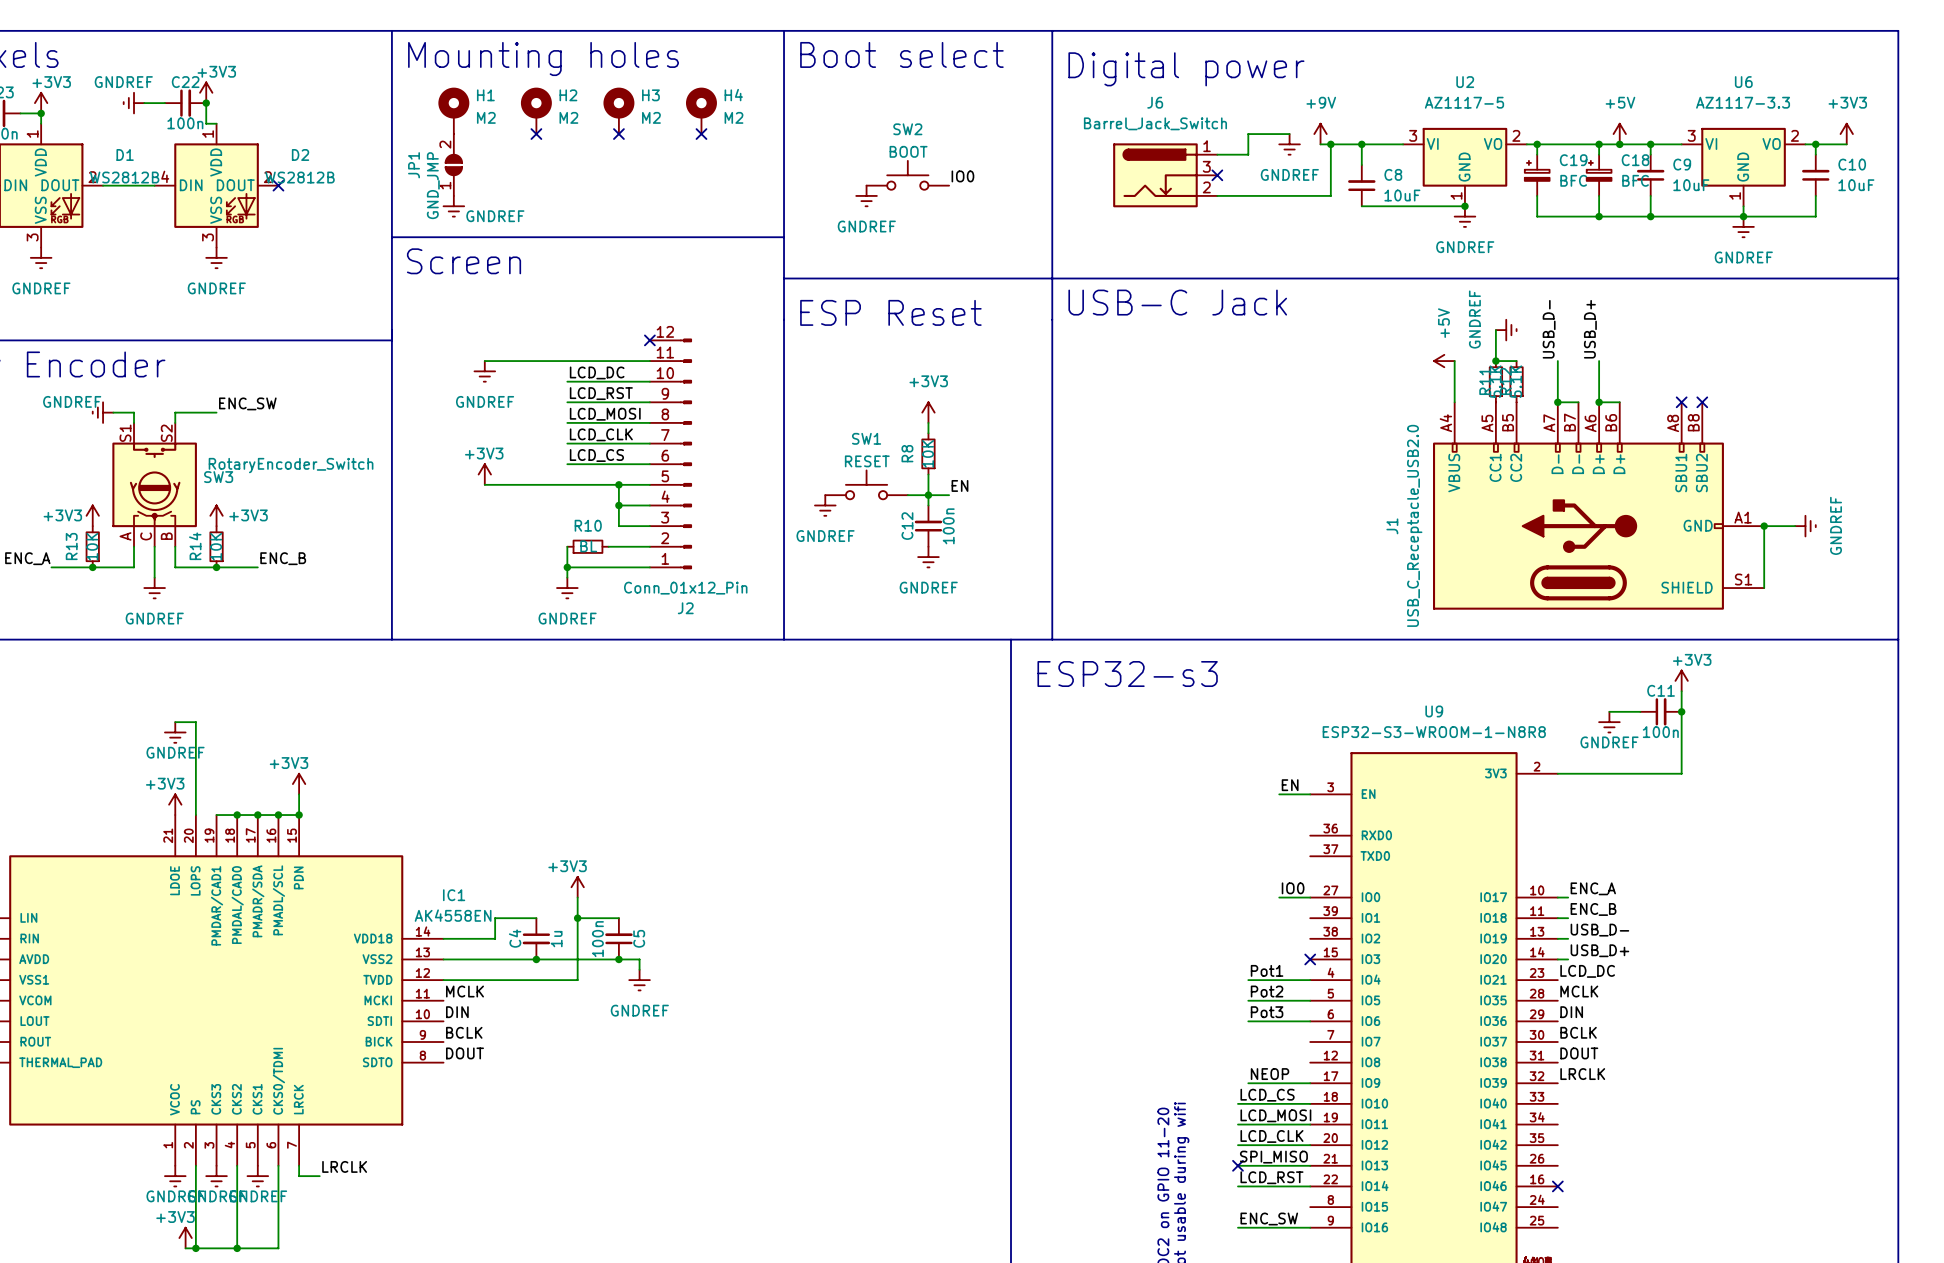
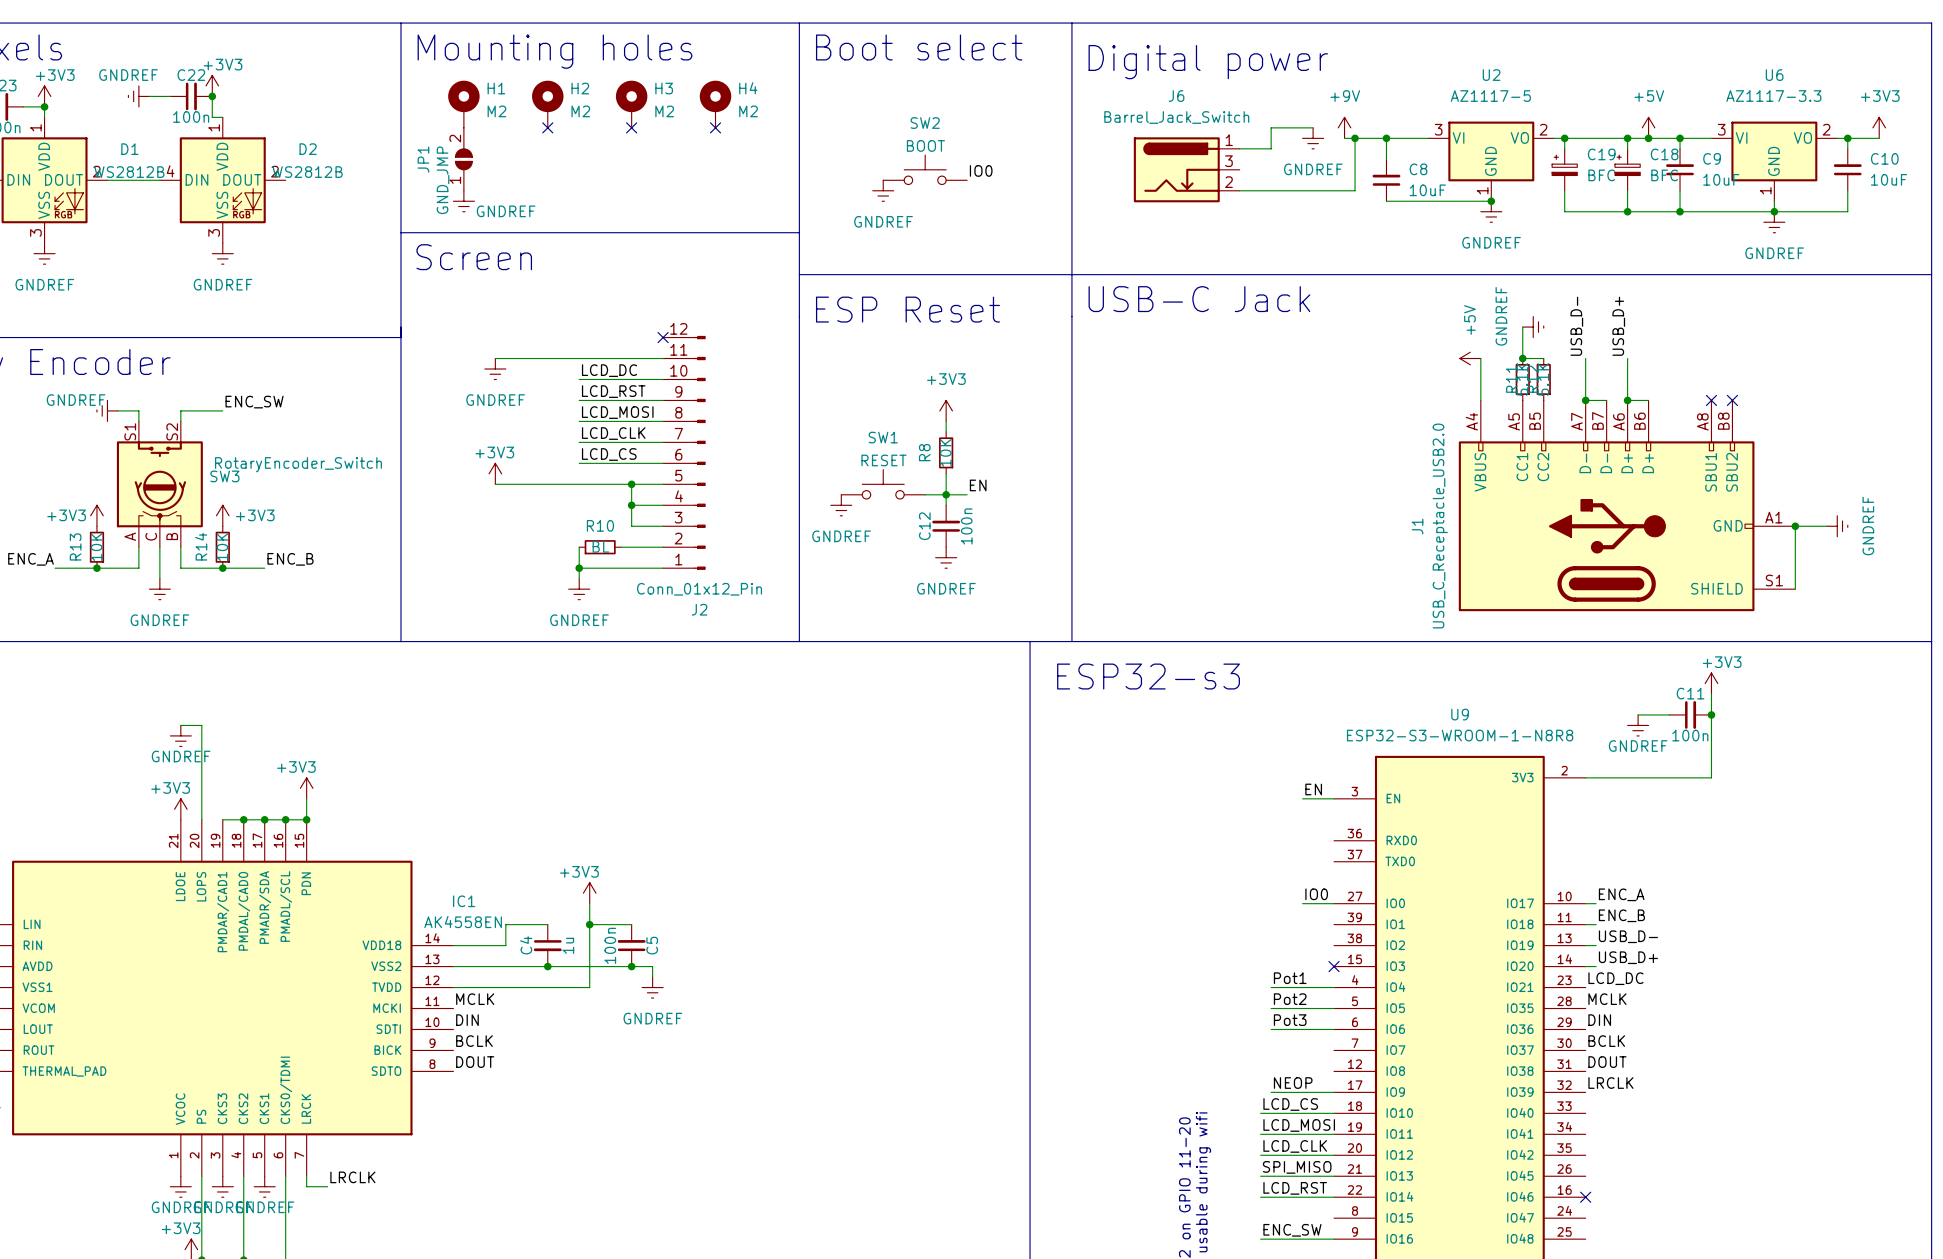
no-connect mark: (1217, 175) -> none
no-connect mark: (278, 185) -> none
no-connect mark: (1237, 1165) -> none

